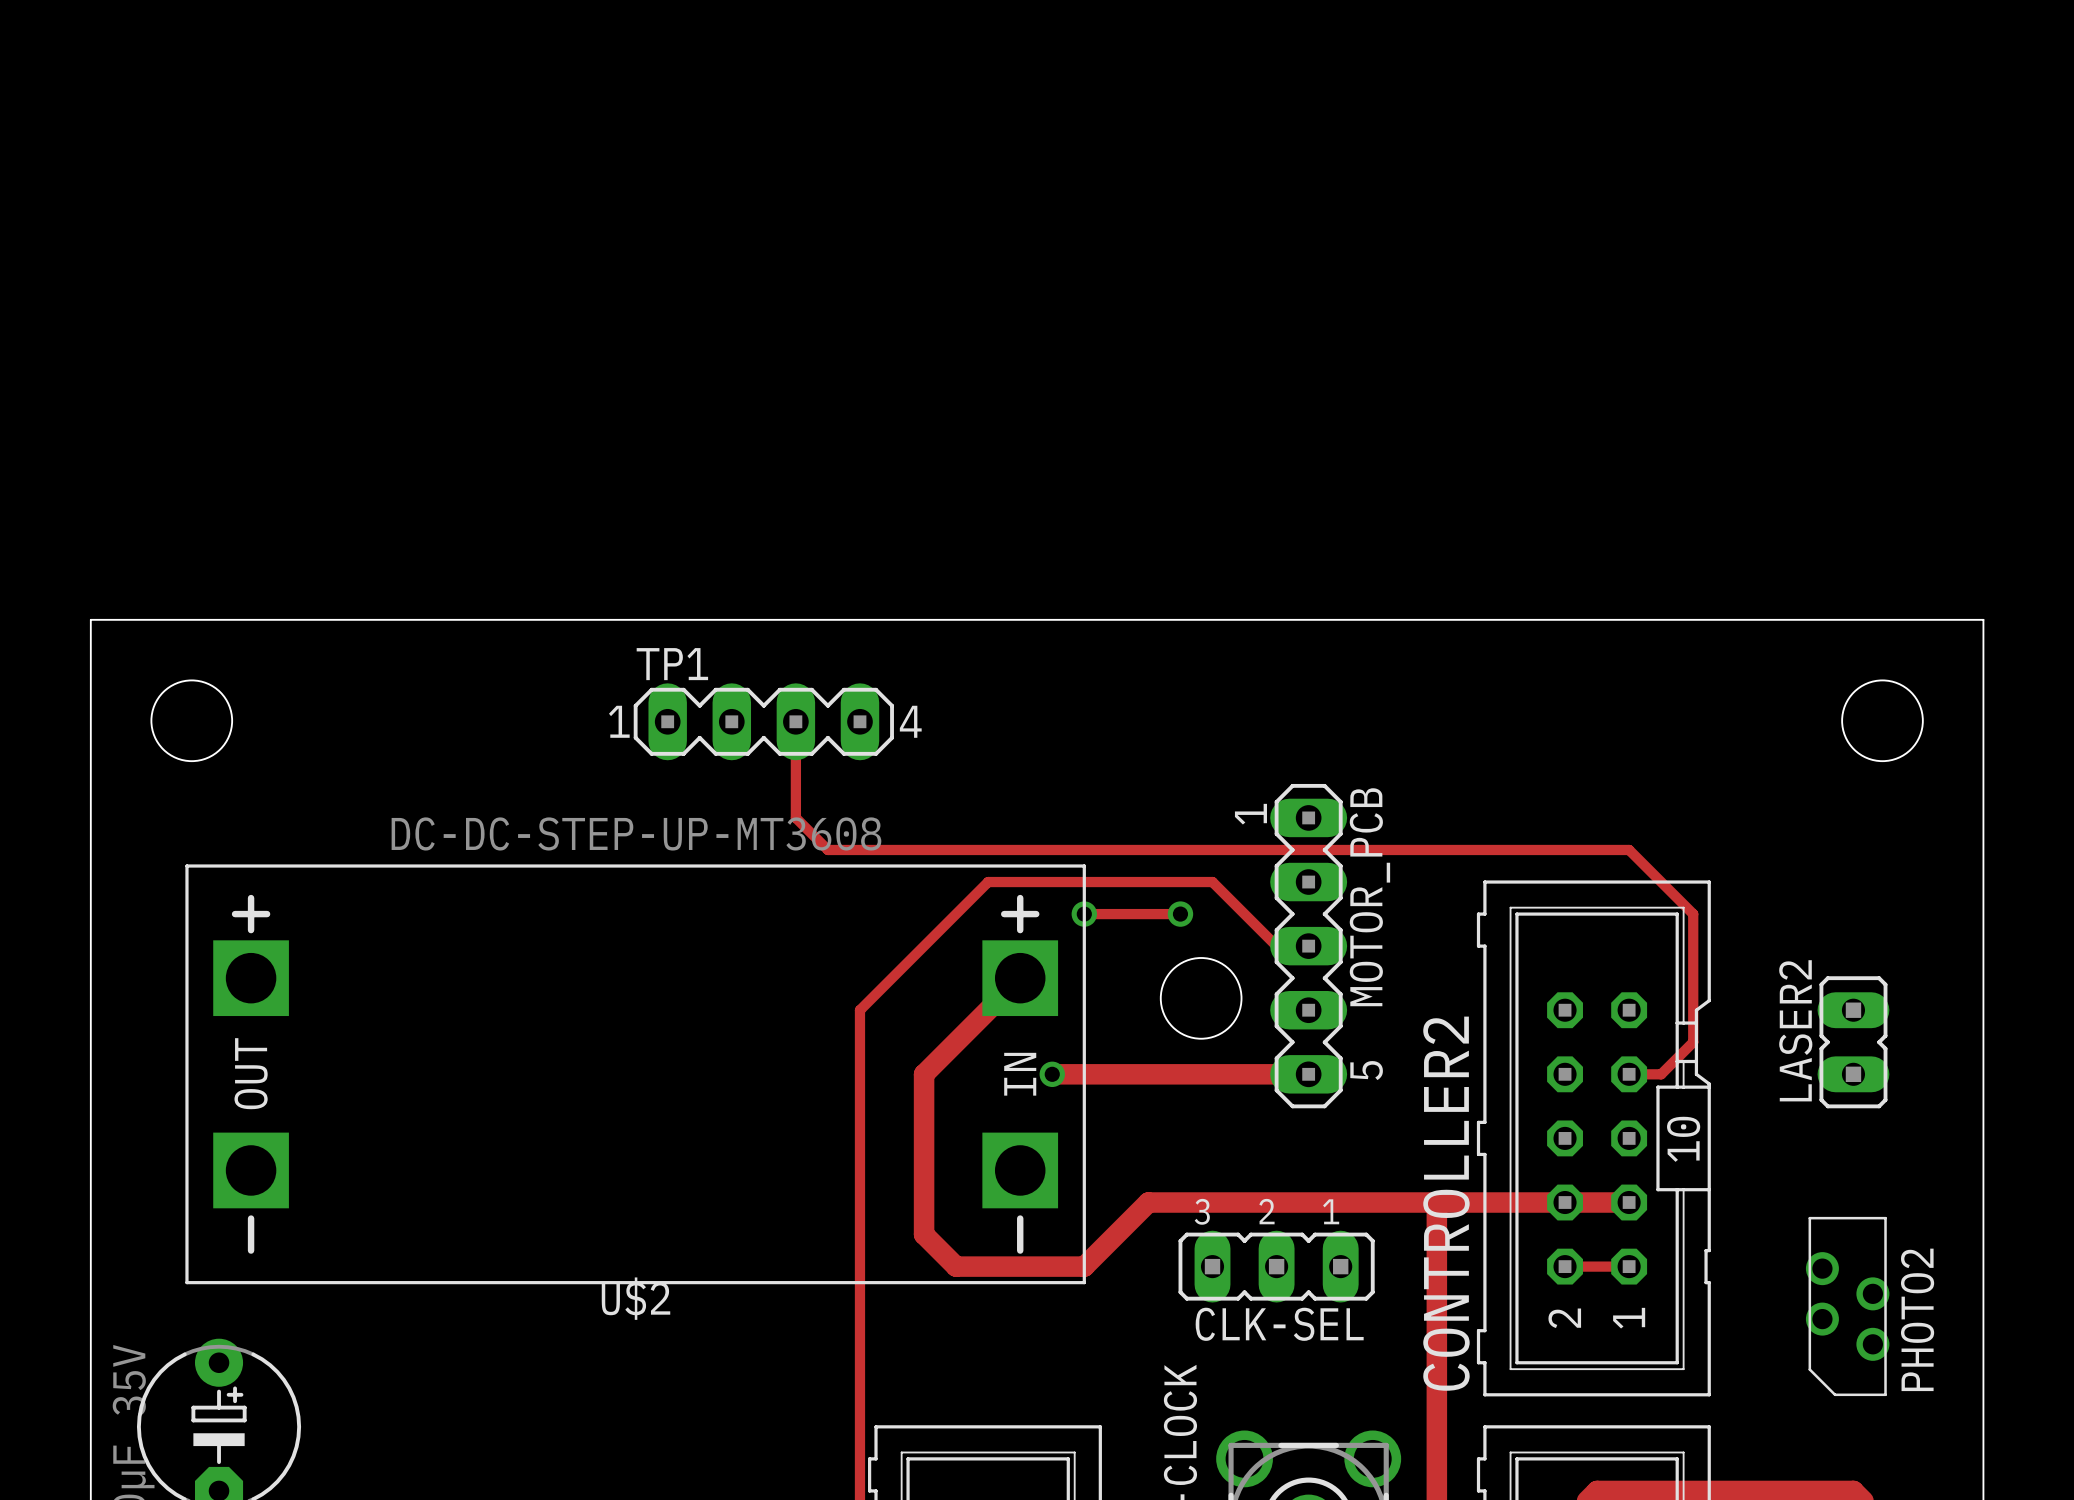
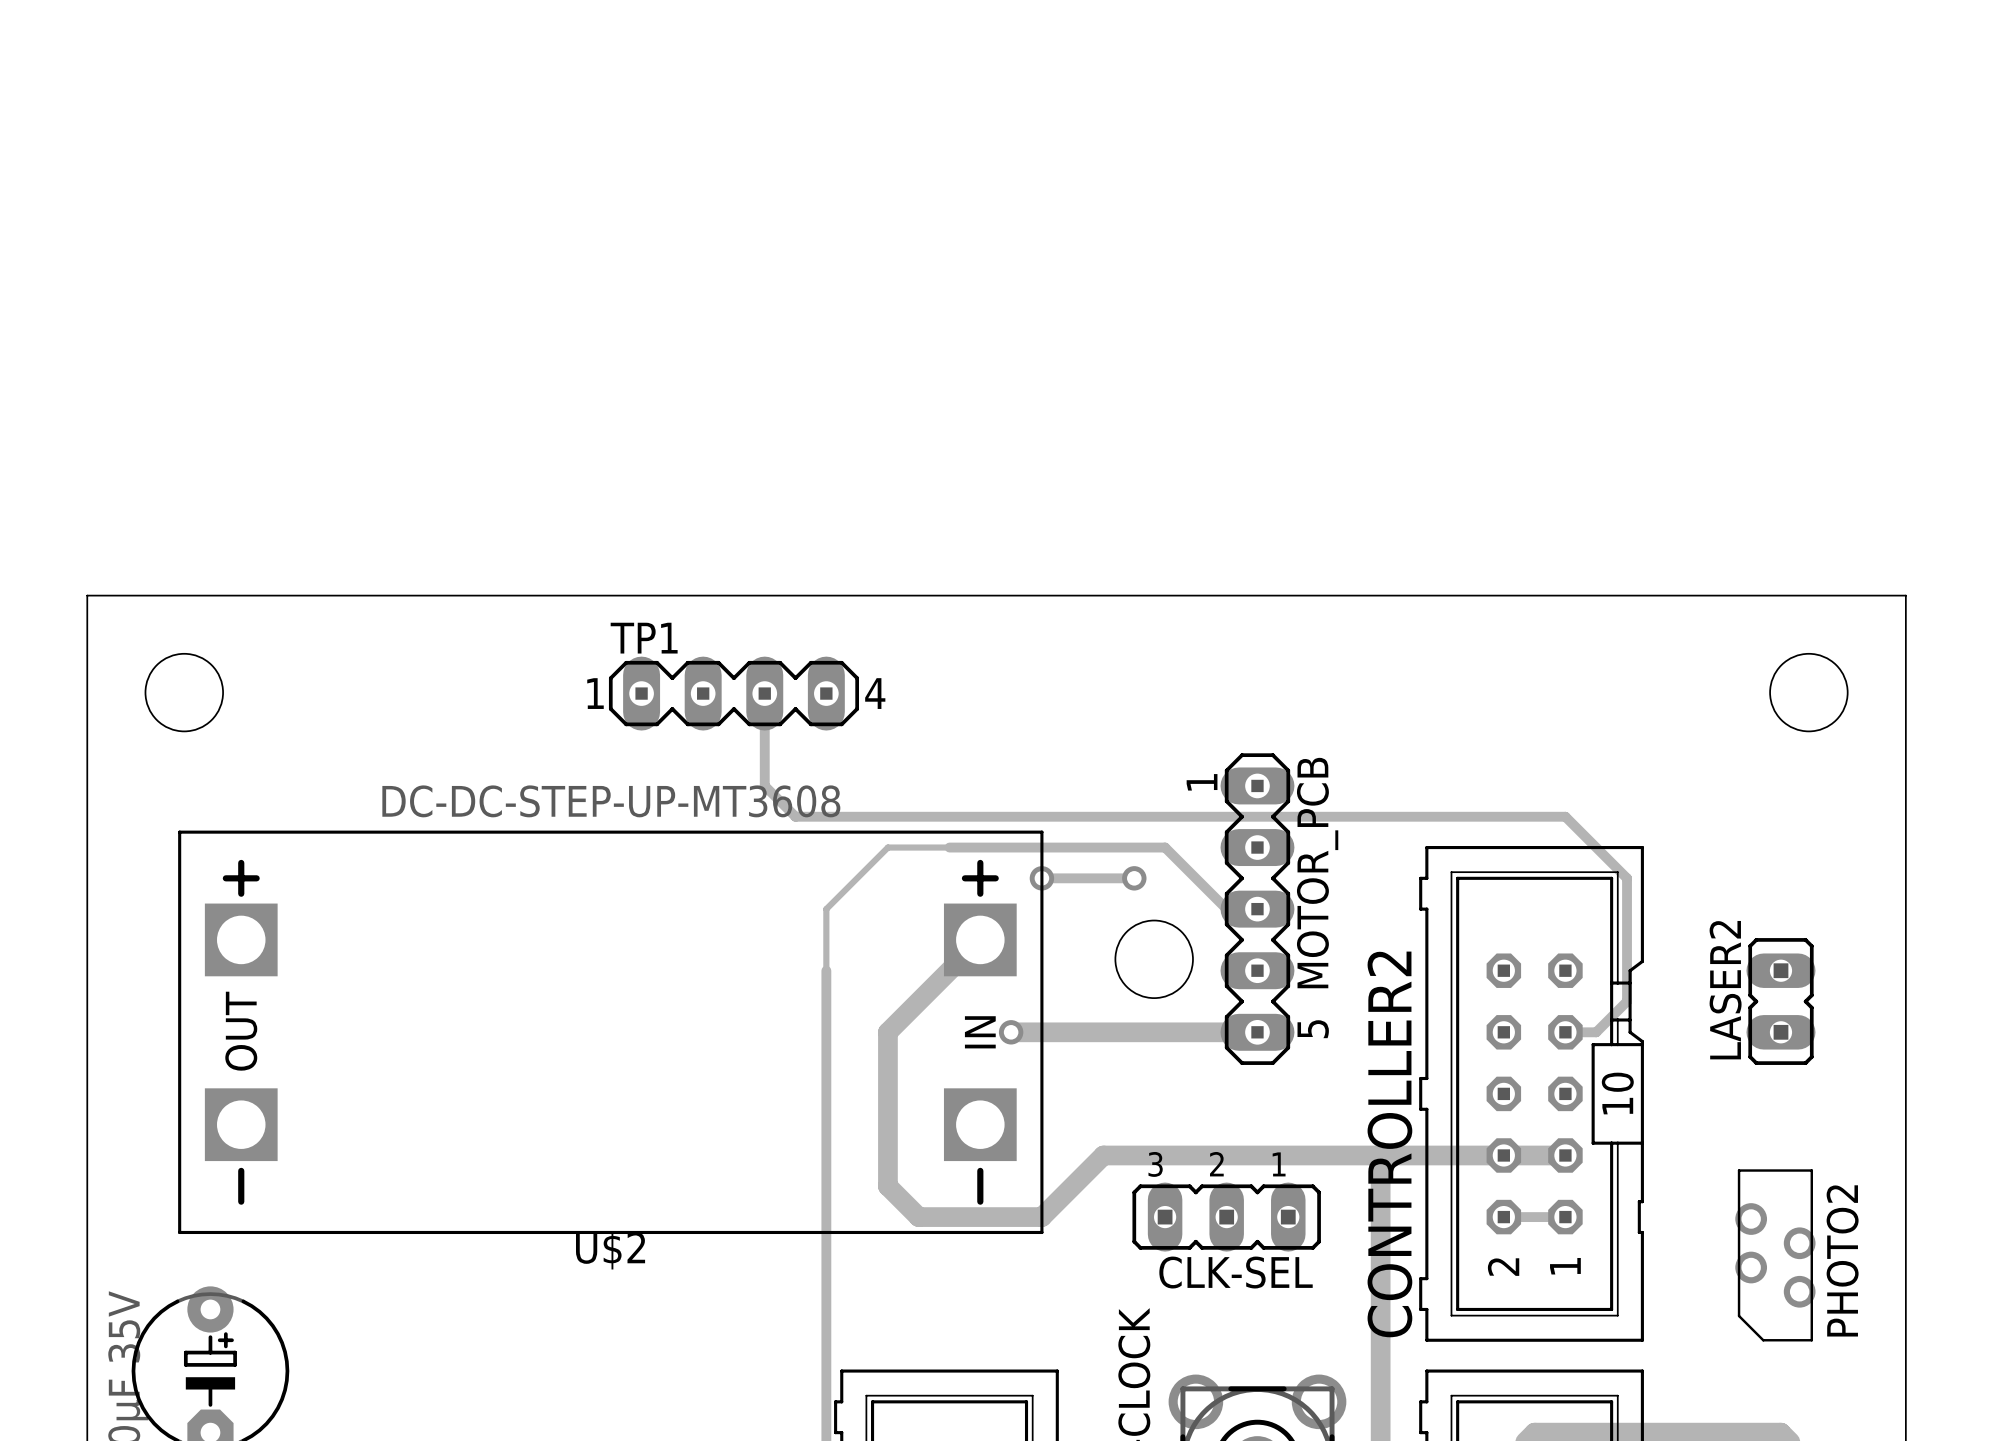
track: (988, 882) (859, 1010) -> (949, 847) (887, 847) (826, 909) (826, 970)

